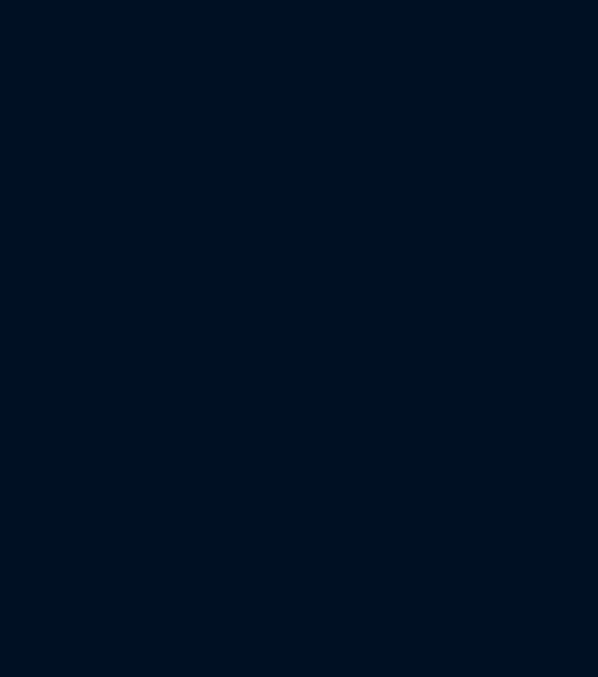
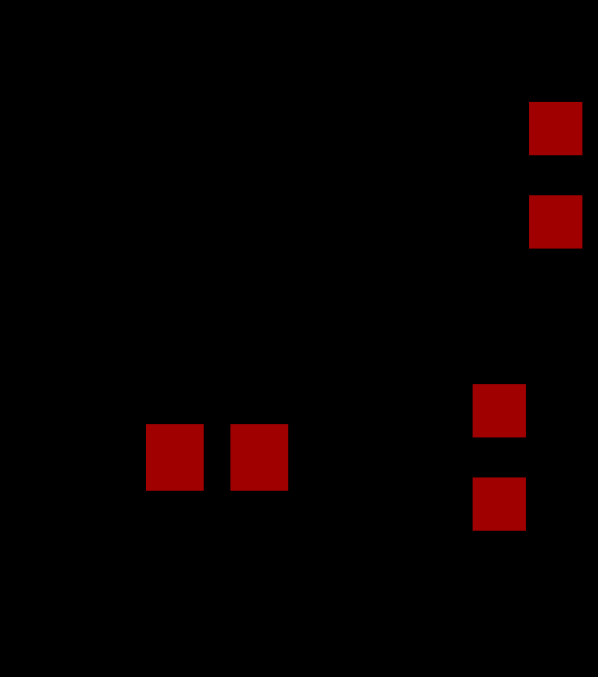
part: none -> (555, 175)
part: none -> (217, 457)
part: none -> (499, 457)

